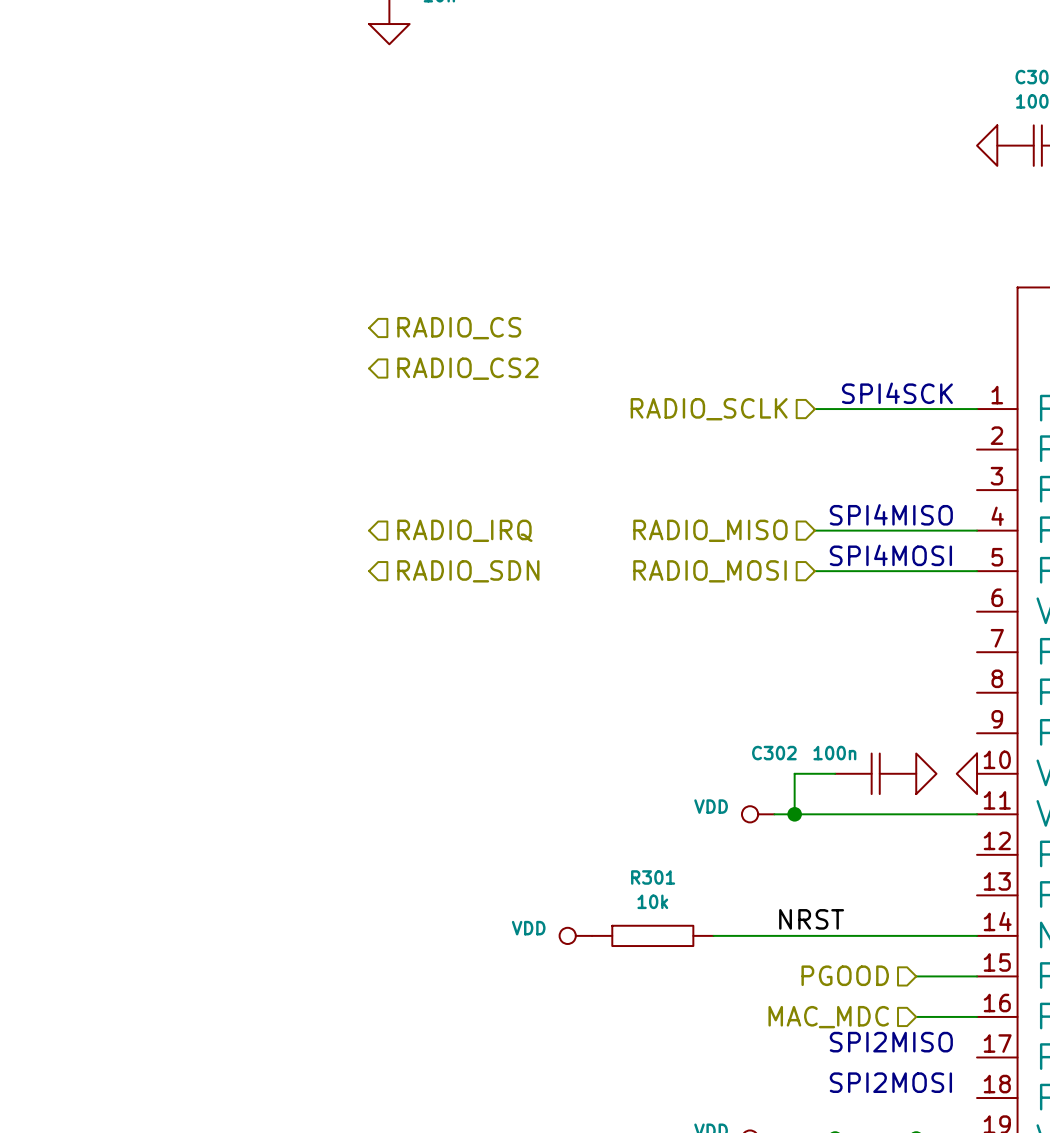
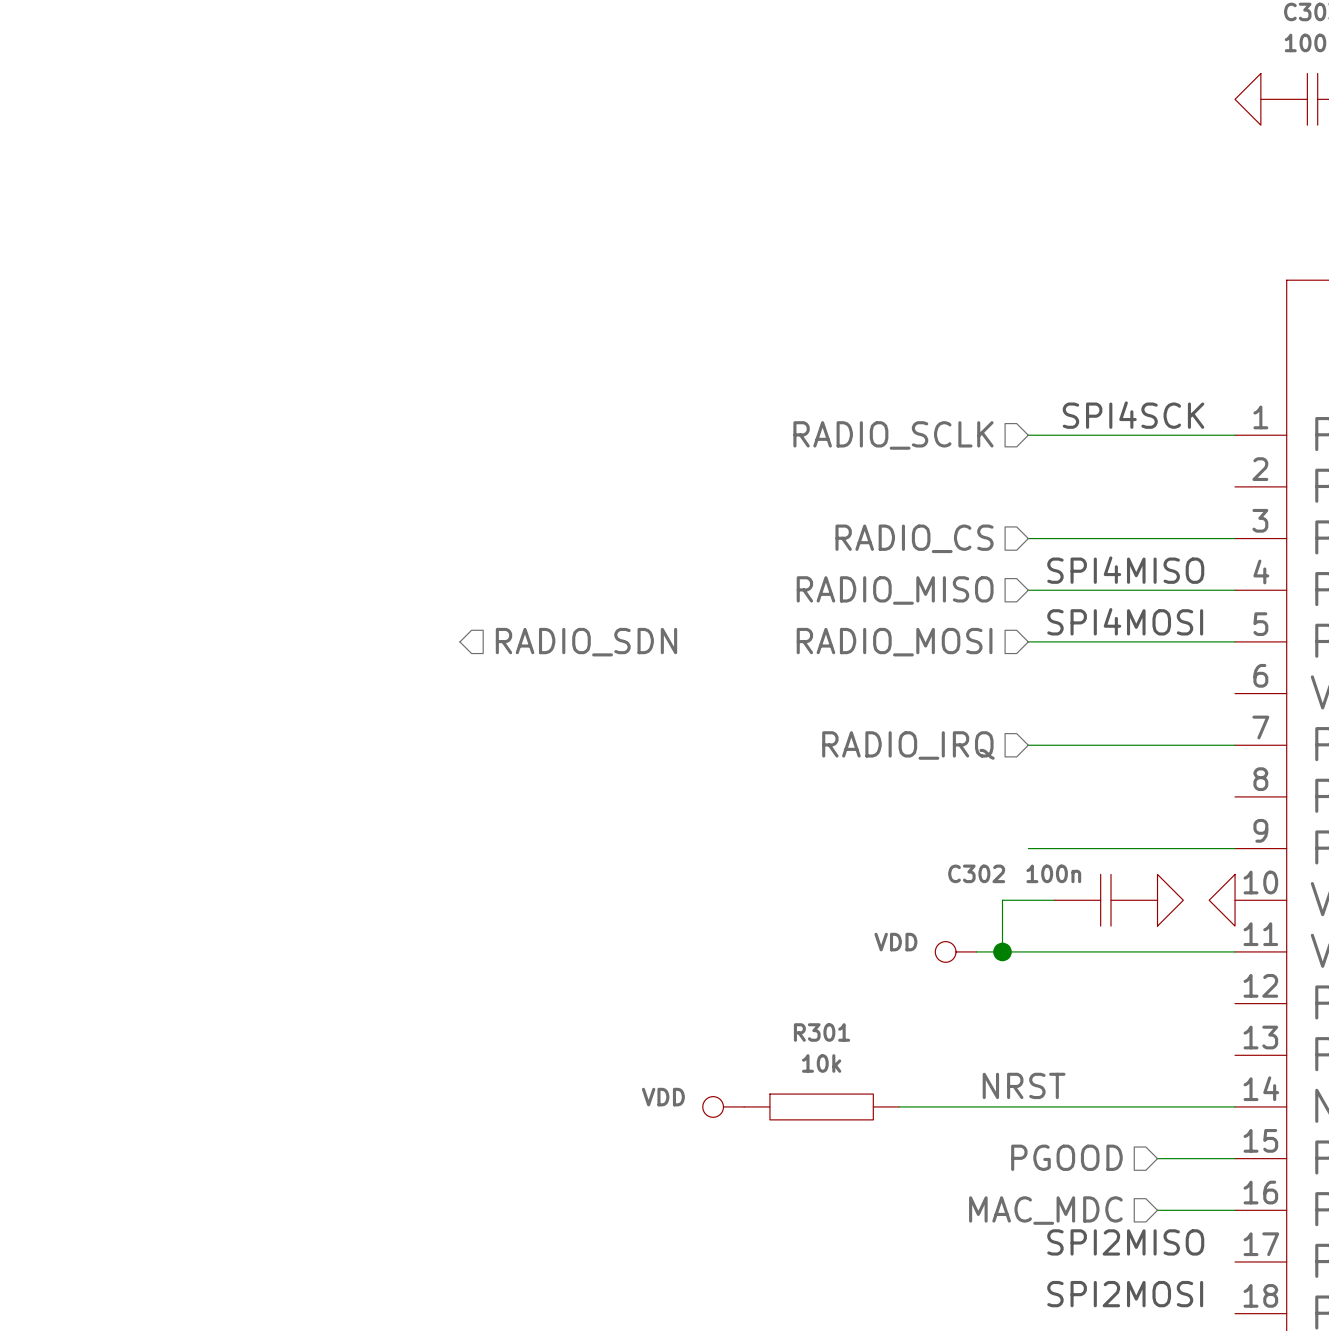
hierarchical label: RADIO_CS (459, 328) -> none
hierarchical label: RADIO_CS2 (467, 368) -> none
hierarchical label: none -> RADIO_CS (914, 538)
wire: none -> (1028, 538) (1235, 538)
hierarchical label: RADIO_IRQ (464, 530) -> none
hierarchical label: none -> RADIO_IRQ (908, 745)
wire: none -> (1028, 745) (1235, 745)
wire: none -> (1028, 848) (1235, 848)

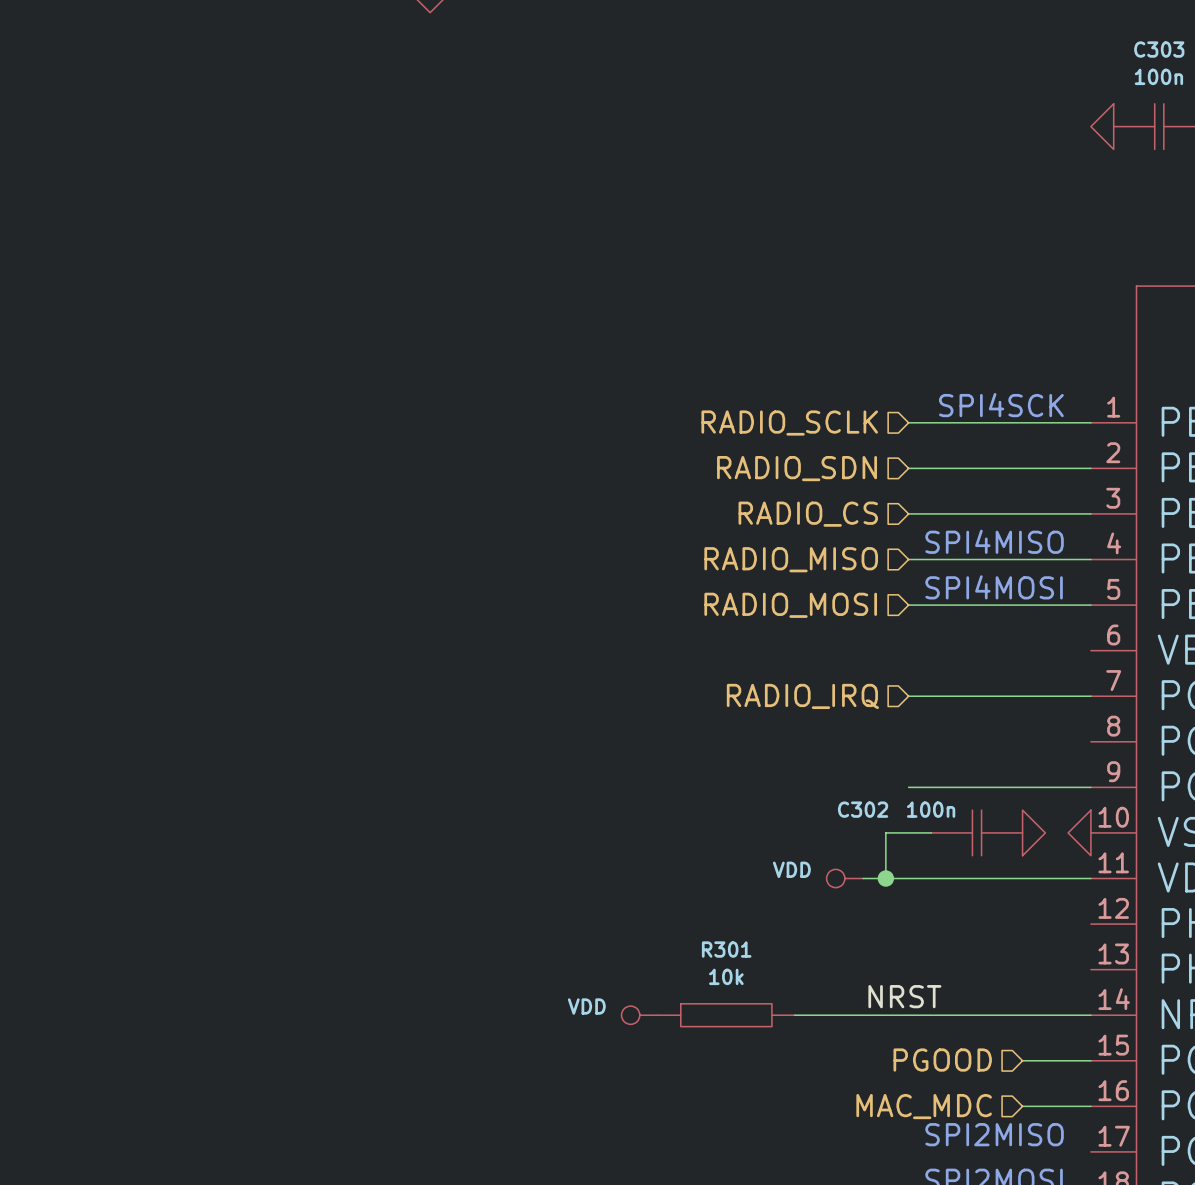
wire: none -> (908, 468) (1090, 468)
hierarchical label: none -> RADIO_SDN (797, 468)
hierarchical label: RADIO_SDN (586, 642) -> none

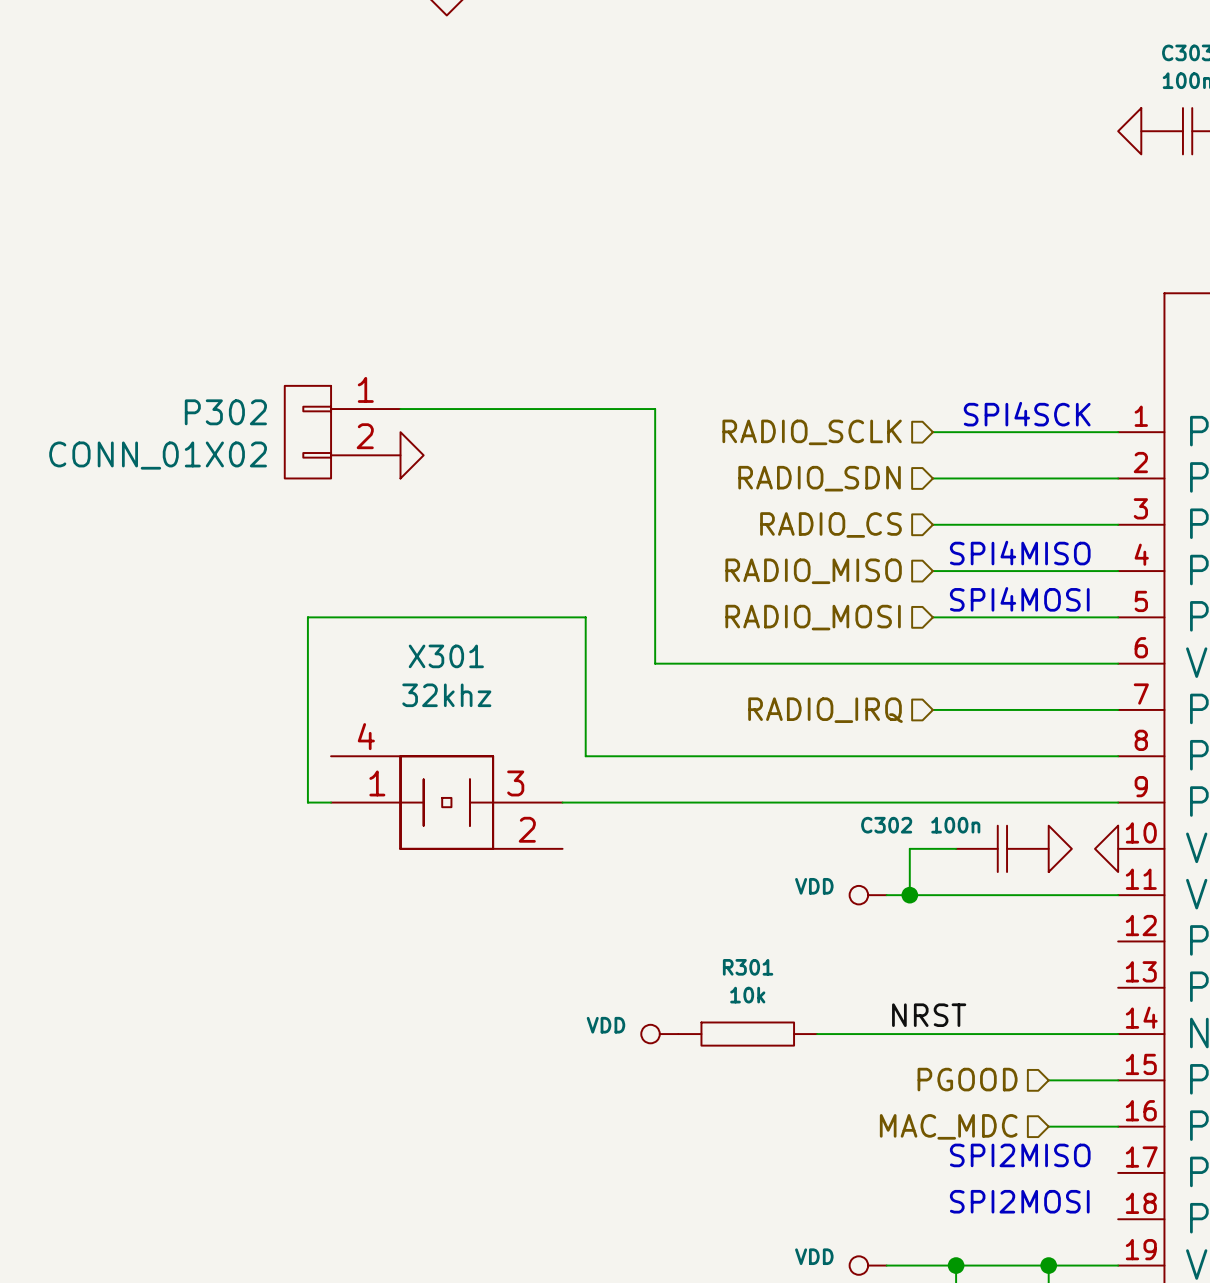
wire: none -> (400, 409) (655, 409) (655, 663) (1118, 663)
P302: none -> CONN_01X02 (342, 432)
power symbol: none -> (412, 455)
wire: none -> (1118, 756) (585, 756) (585, 617) (307, 617) (307, 802) (331, 802)
X301: none -> 32khz (446, 802)
wire: none -> (562, 802) (932, 802)

